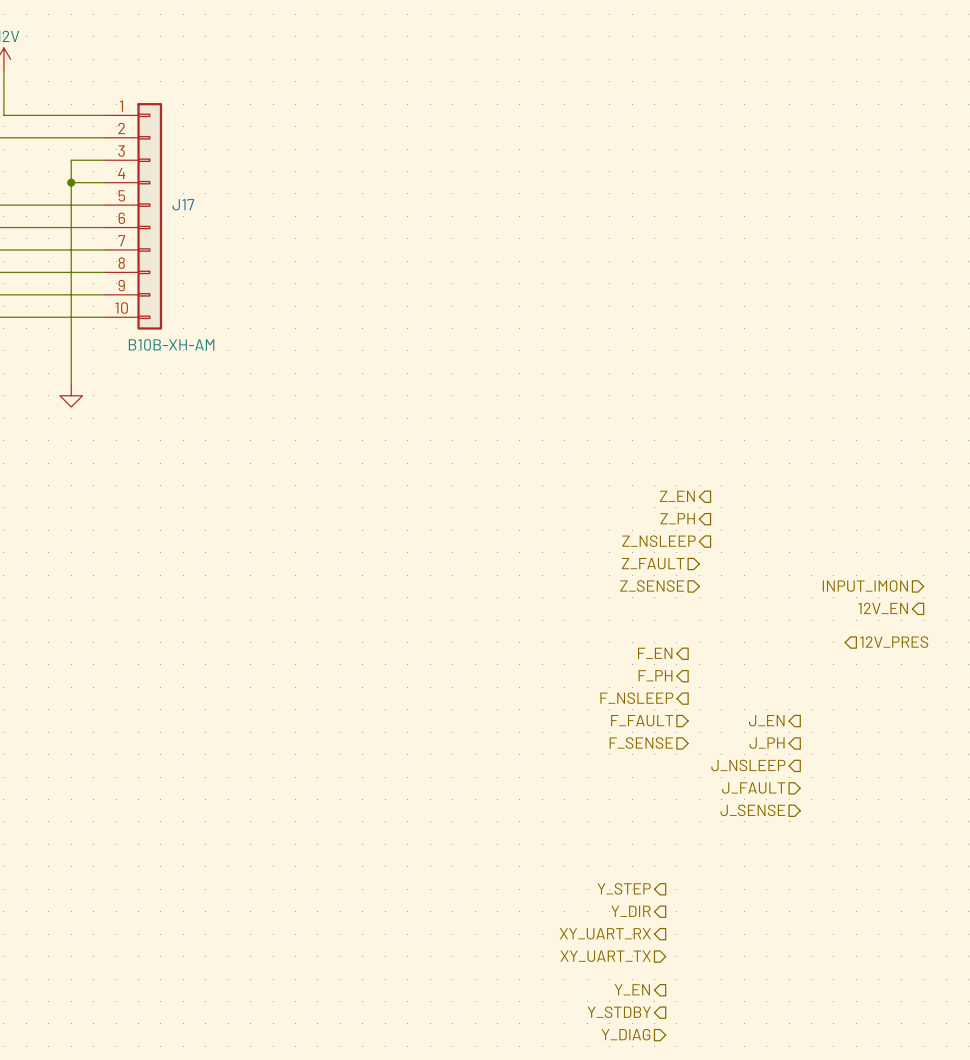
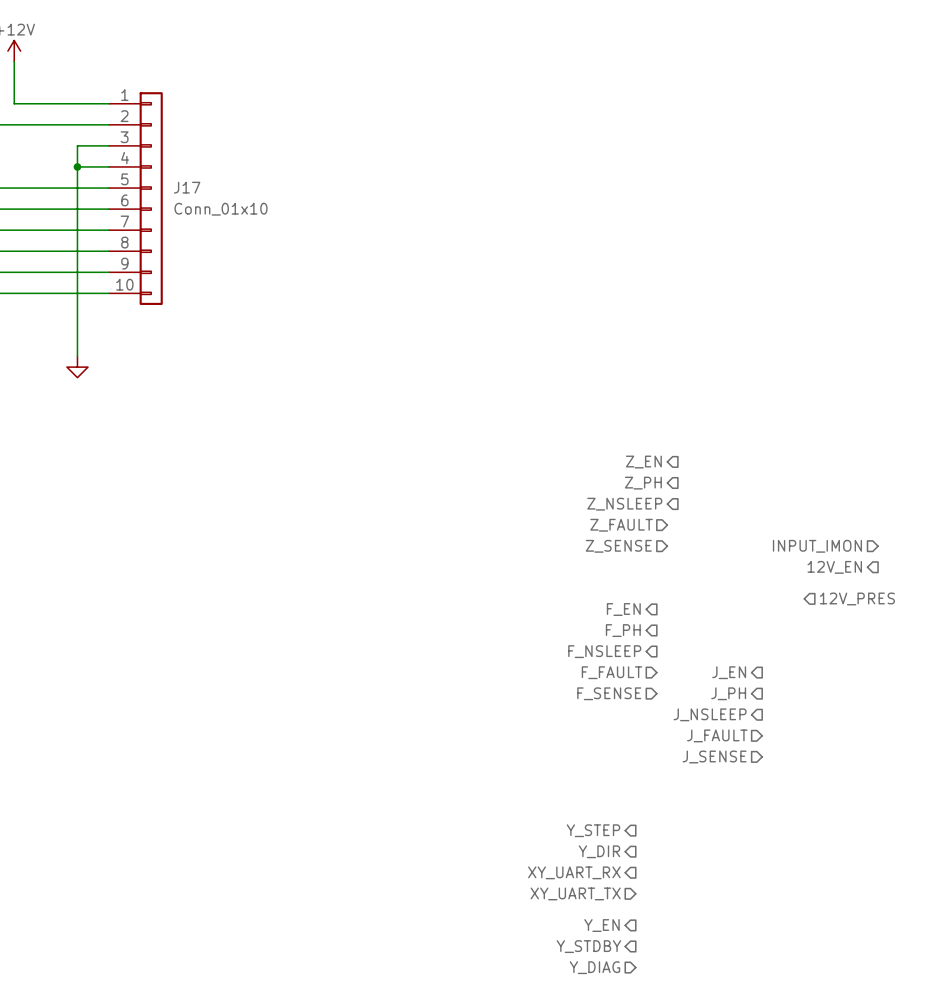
J17 value: B10B-XH-AM (171, 344) -> Conn_01x10 (221, 209)

